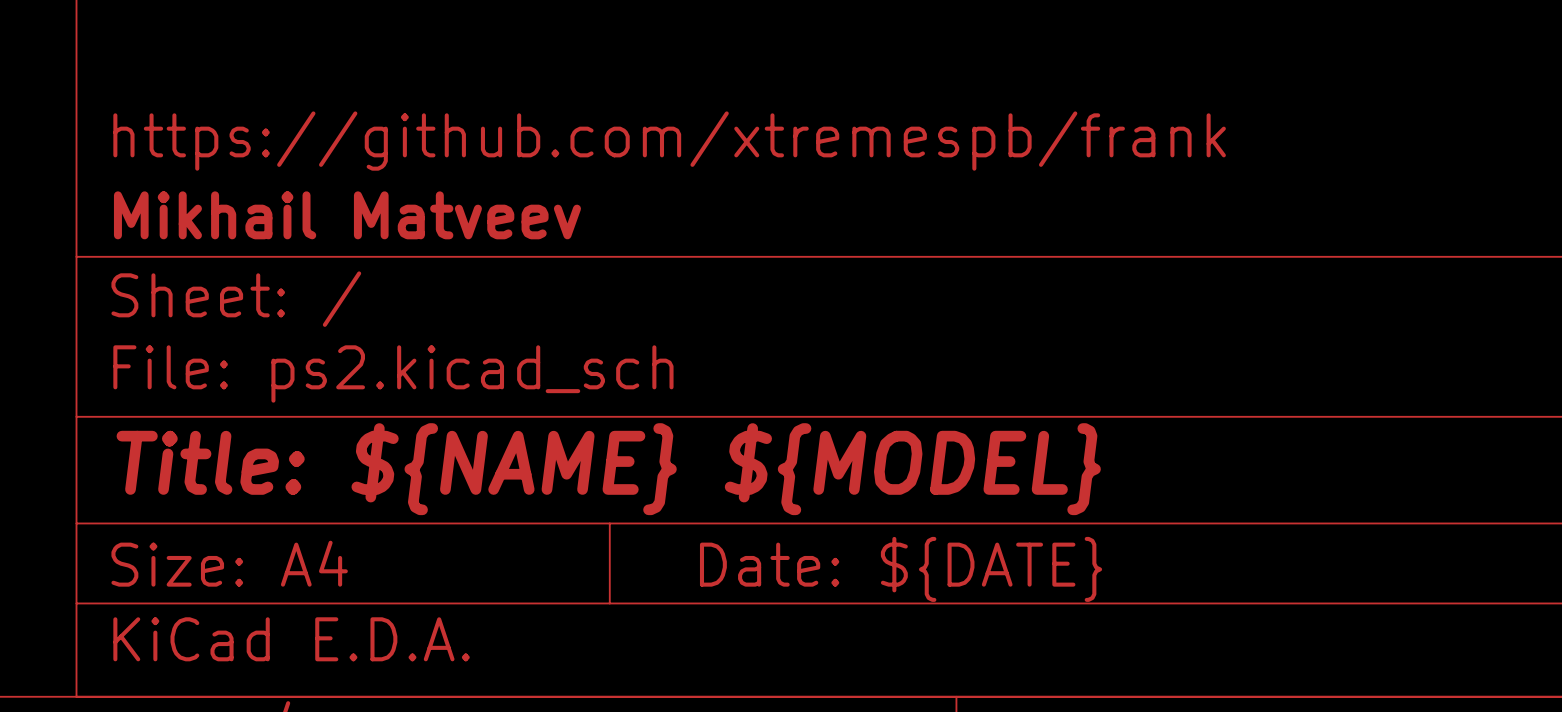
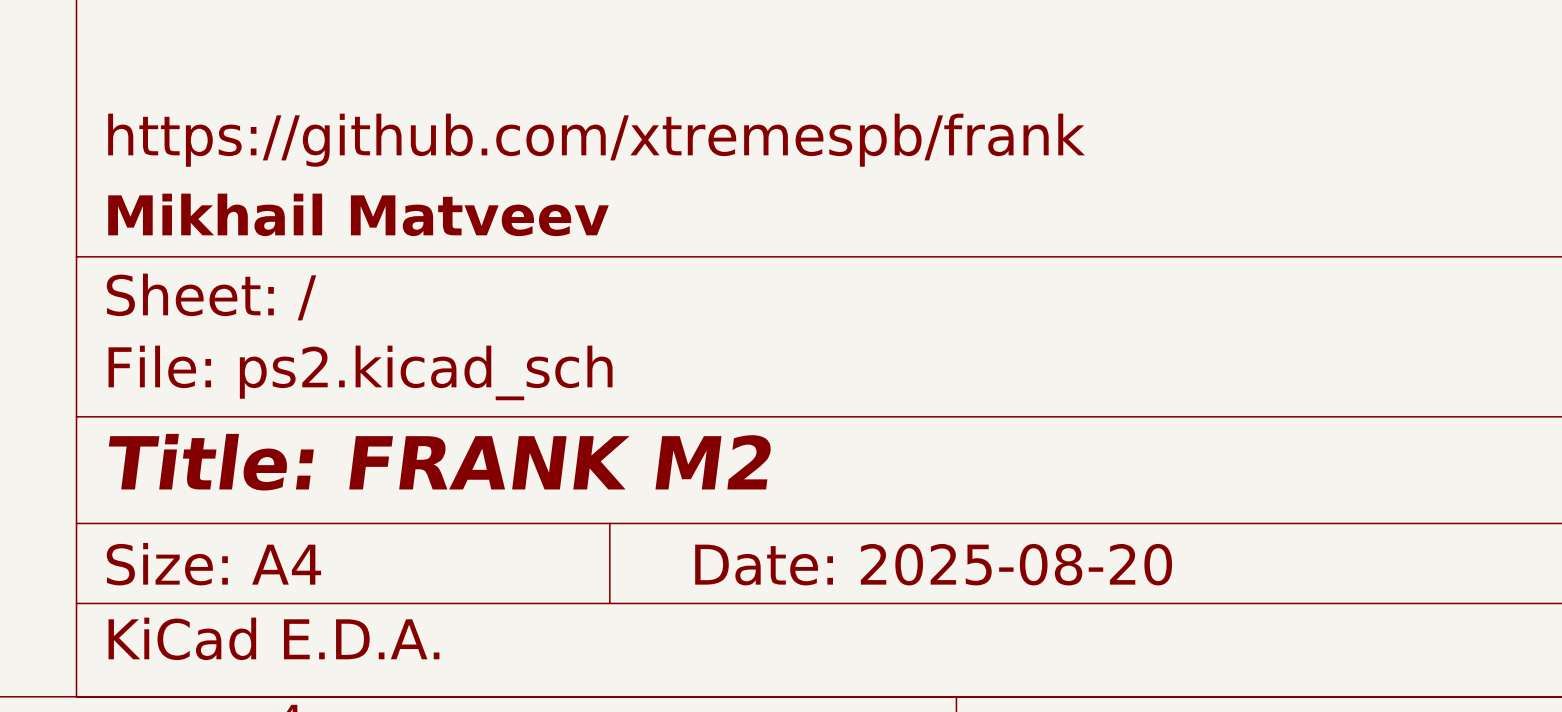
title block: Title: ${NAME} ${MODEL} (608, 469) -> Title: FRANK M2 (440, 462)
title block: Date: ${DATE} (901, 569) -> Date: 2025-08-20 (933, 564)

